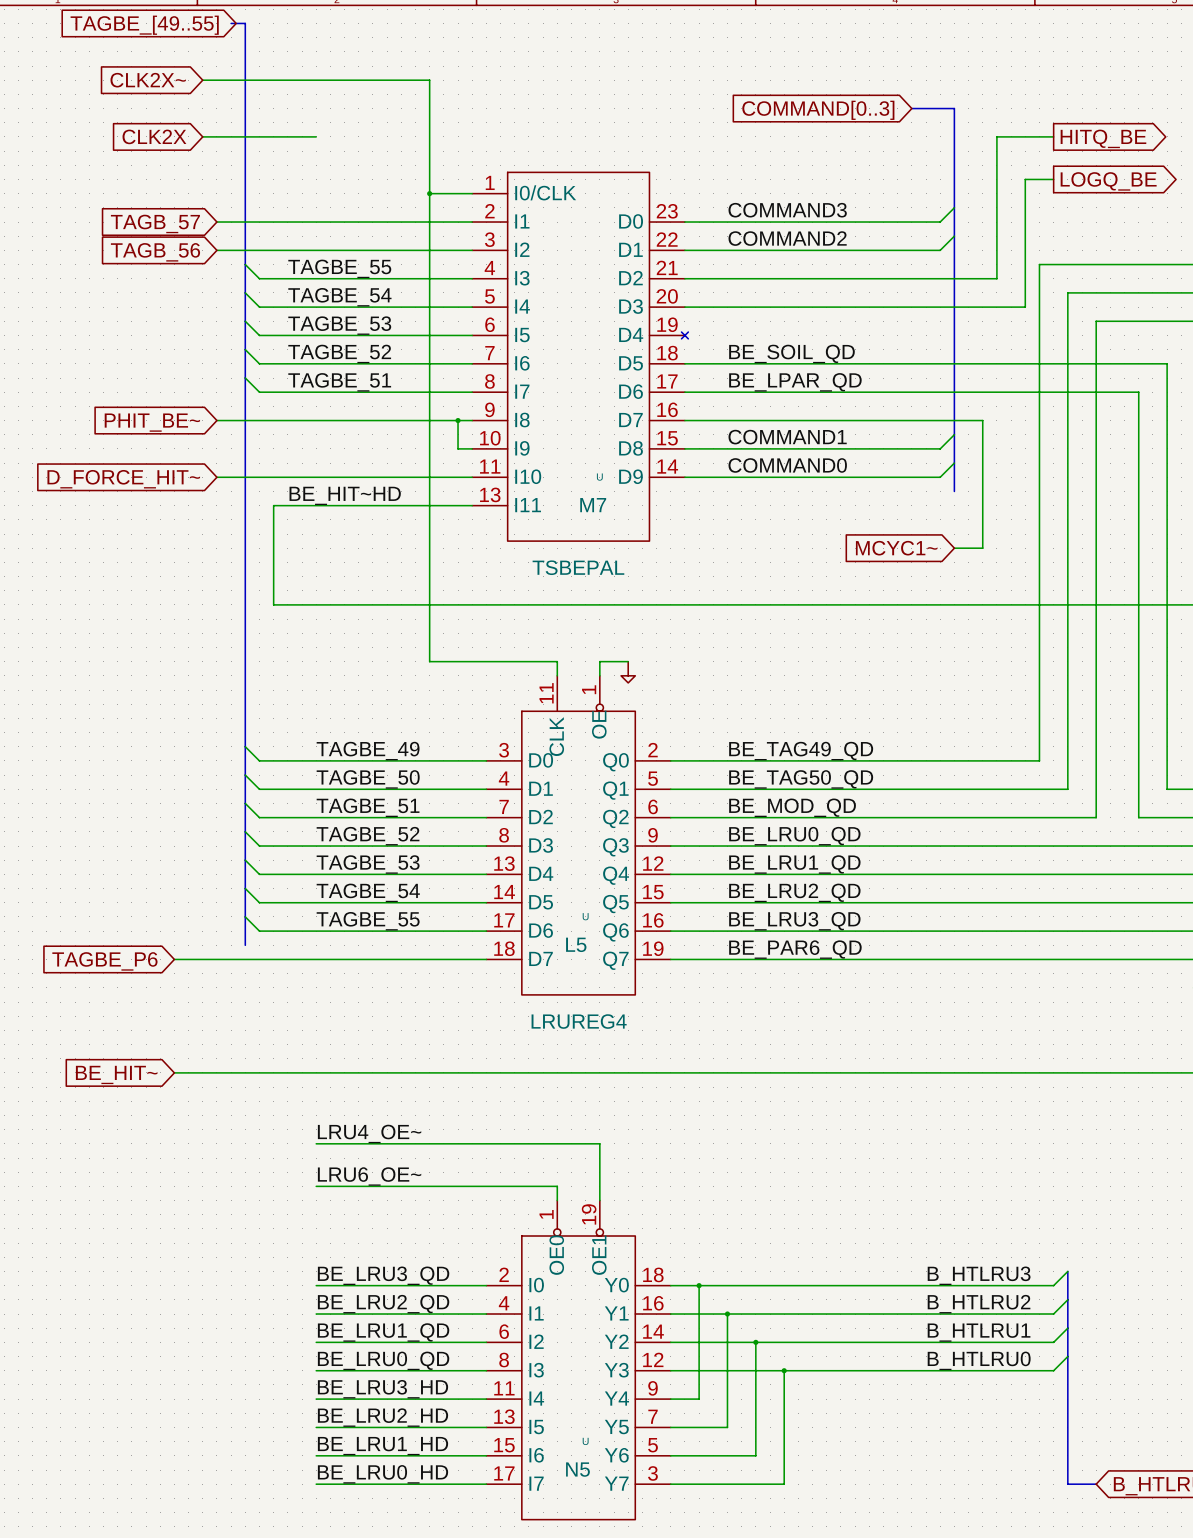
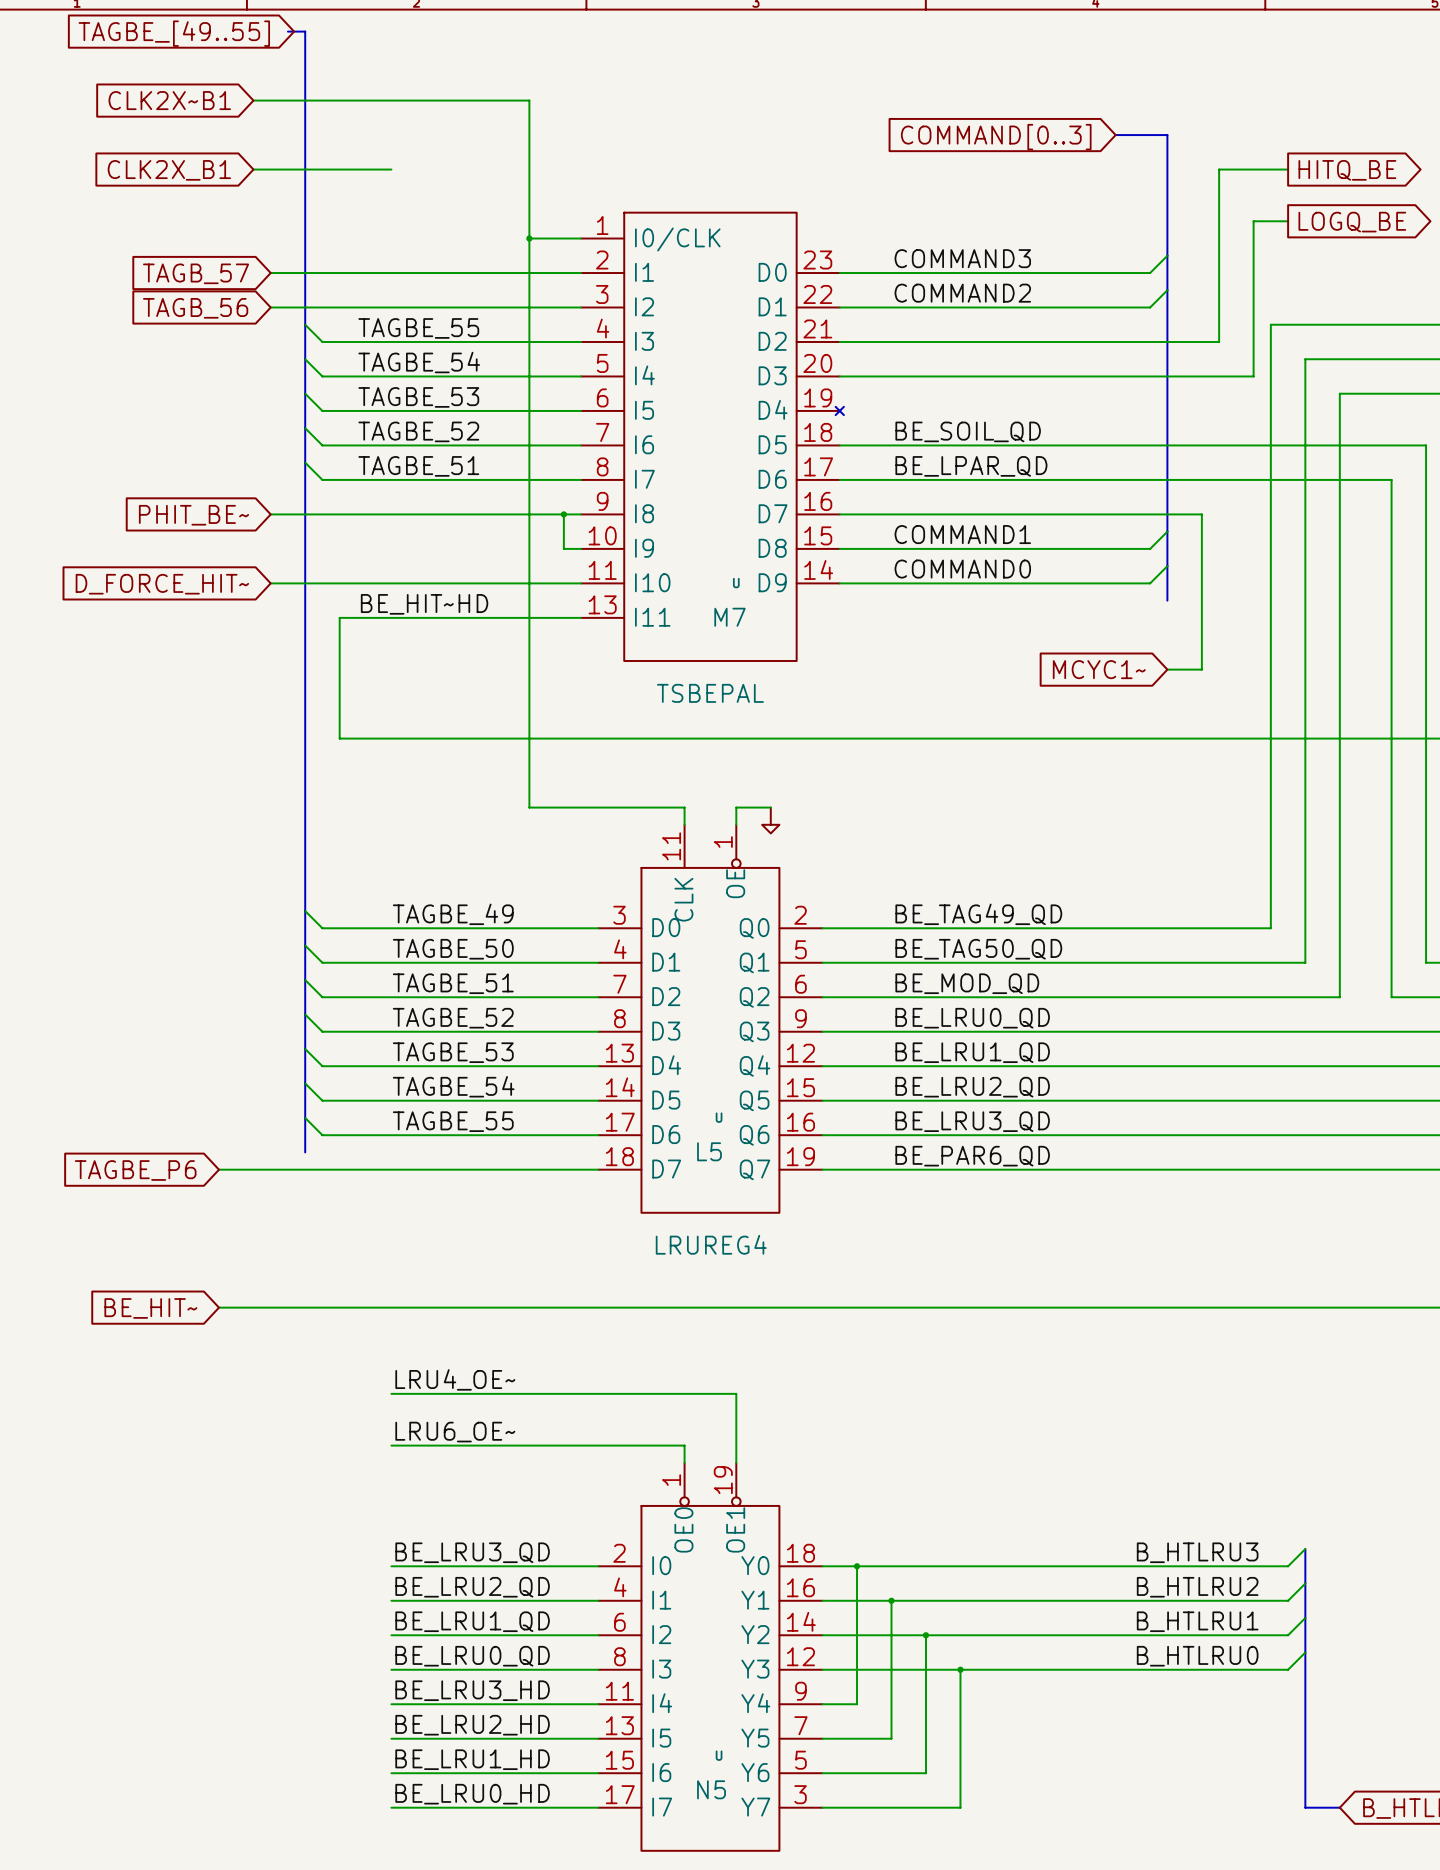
global label: CLK2X~ (148, 80) -> CLK2X~B1 (169, 100)
global label: CLK2X (154, 136) -> CLK2X_B1 (169, 170)

